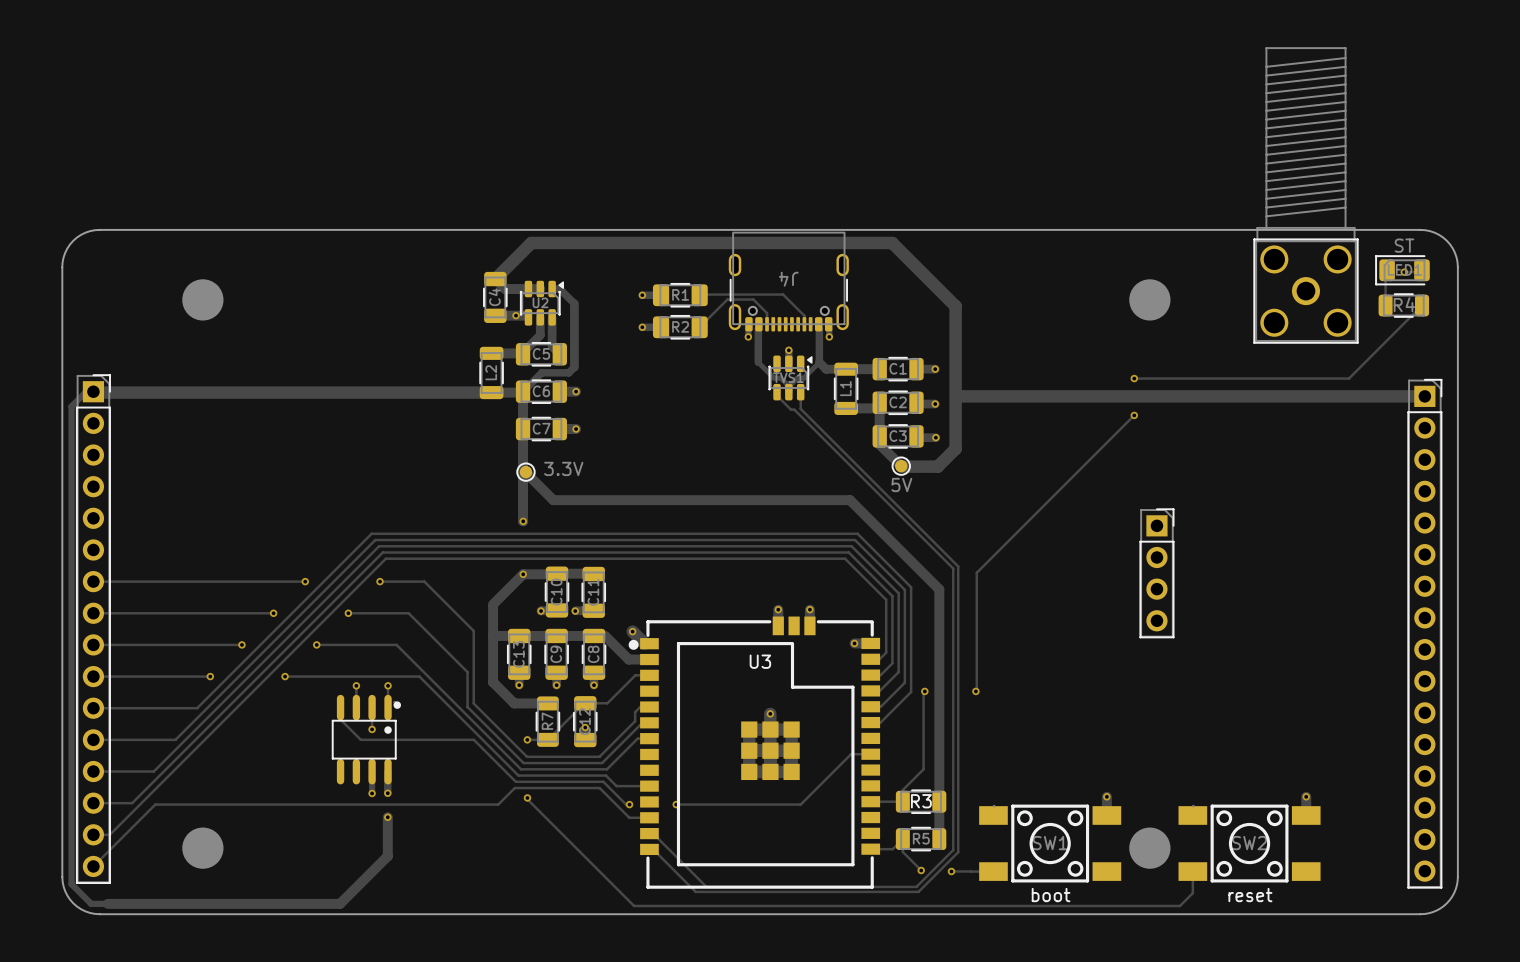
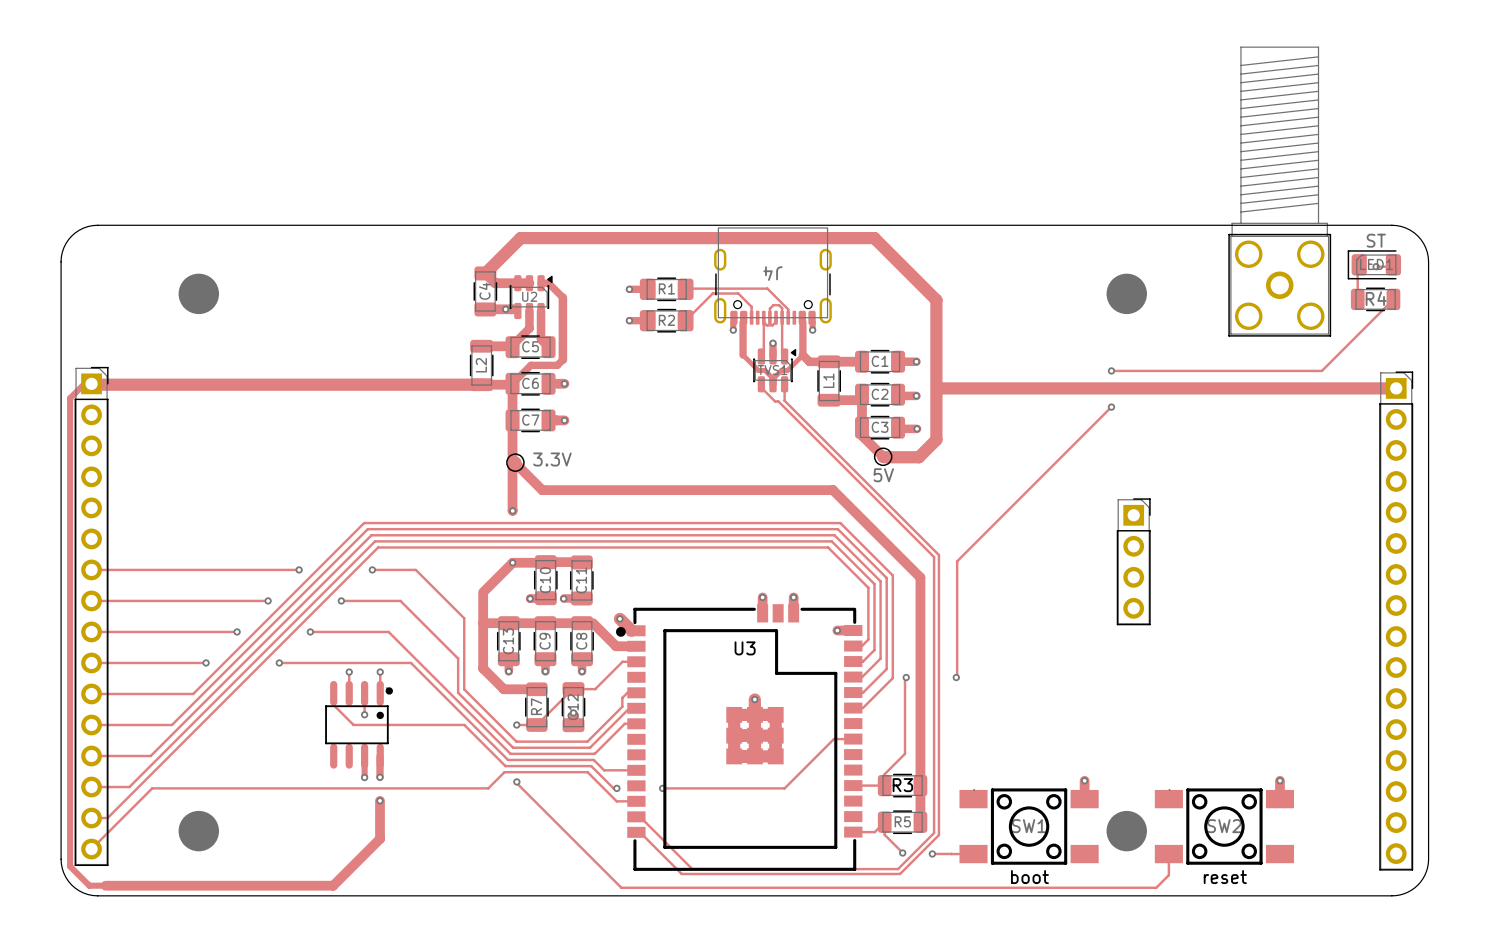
track: none -> (763, 315) (763, 354) (761, 356)
track: none -> (769, 315) (769, 308) (773, 305) (779, 305) (782, 308) (782, 354) (784, 356)
track: none -> (776, 315) (776, 321) (772, 325) (766, 325) (763, 322)

